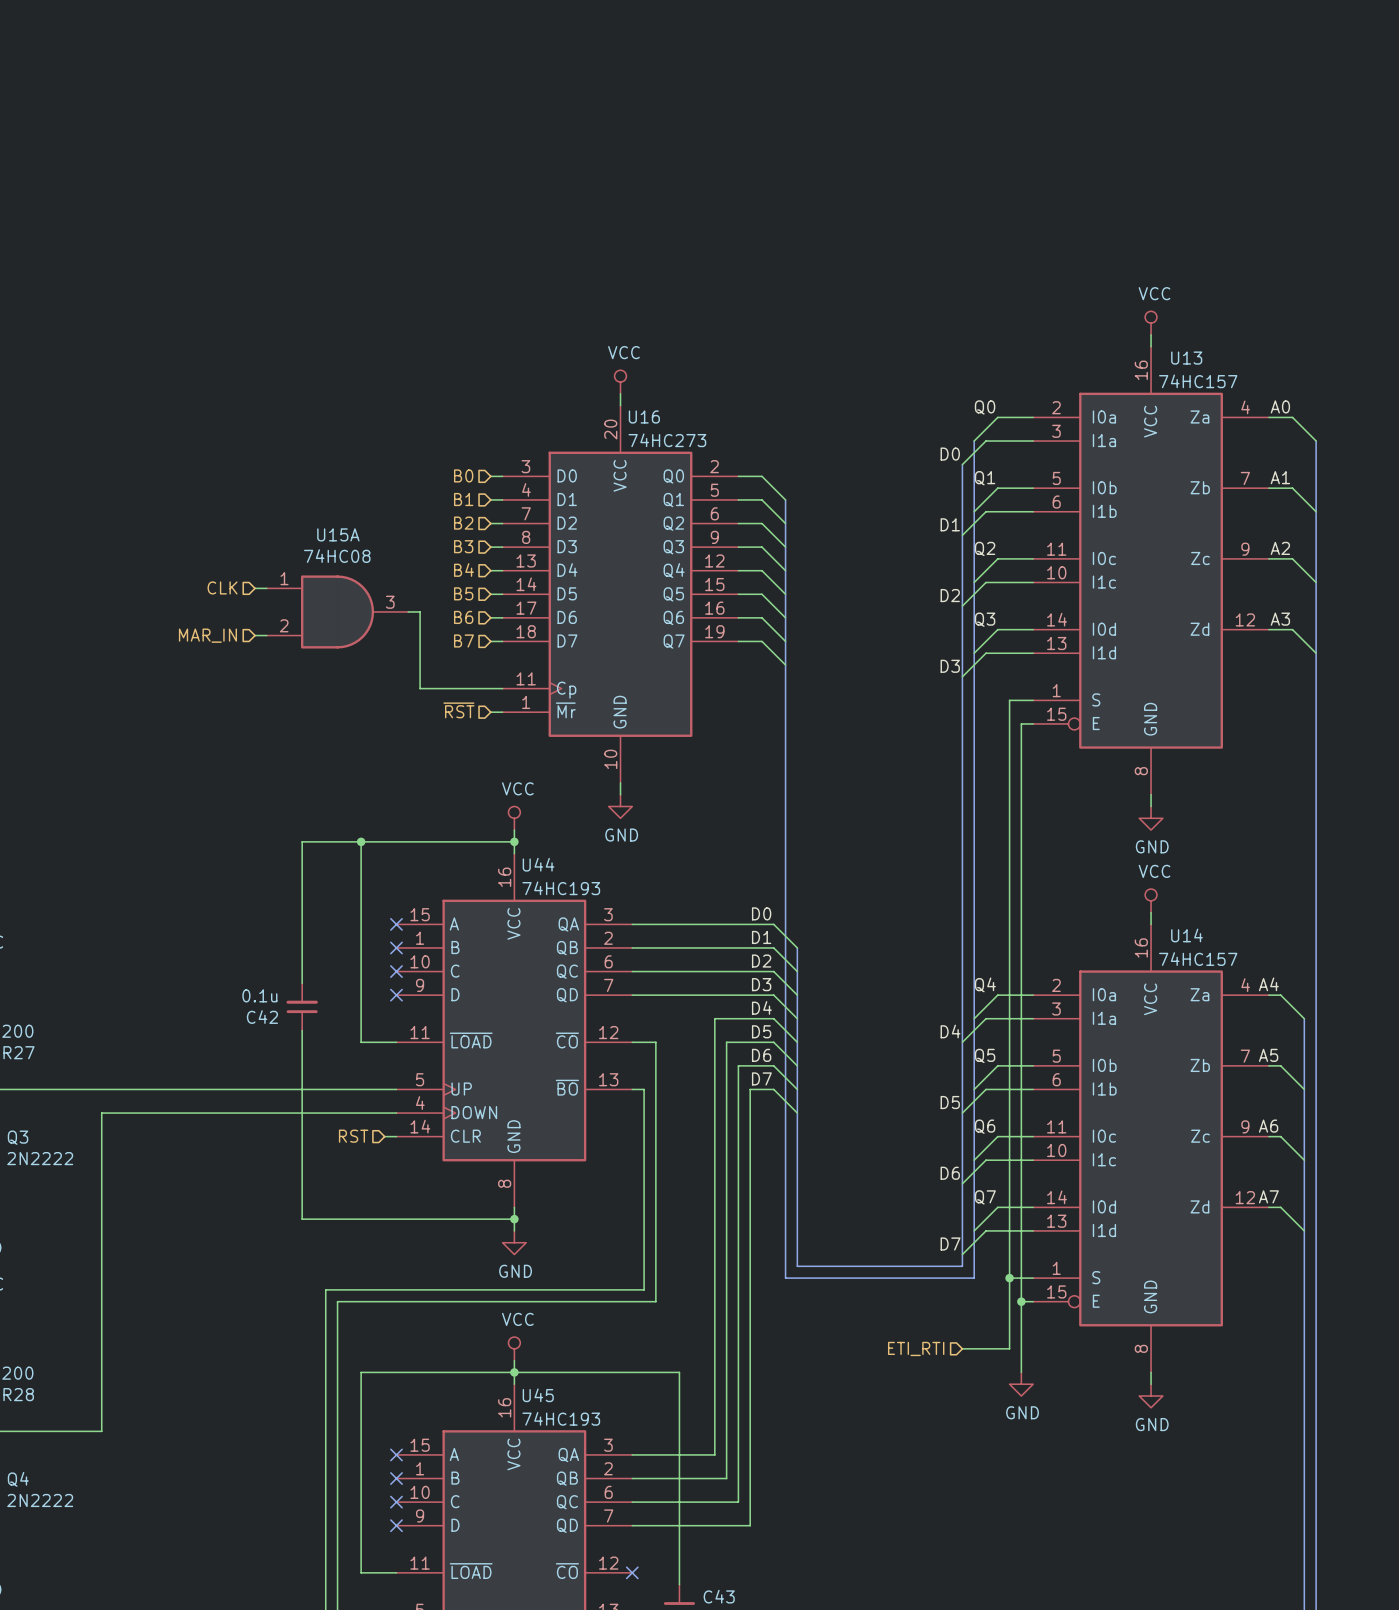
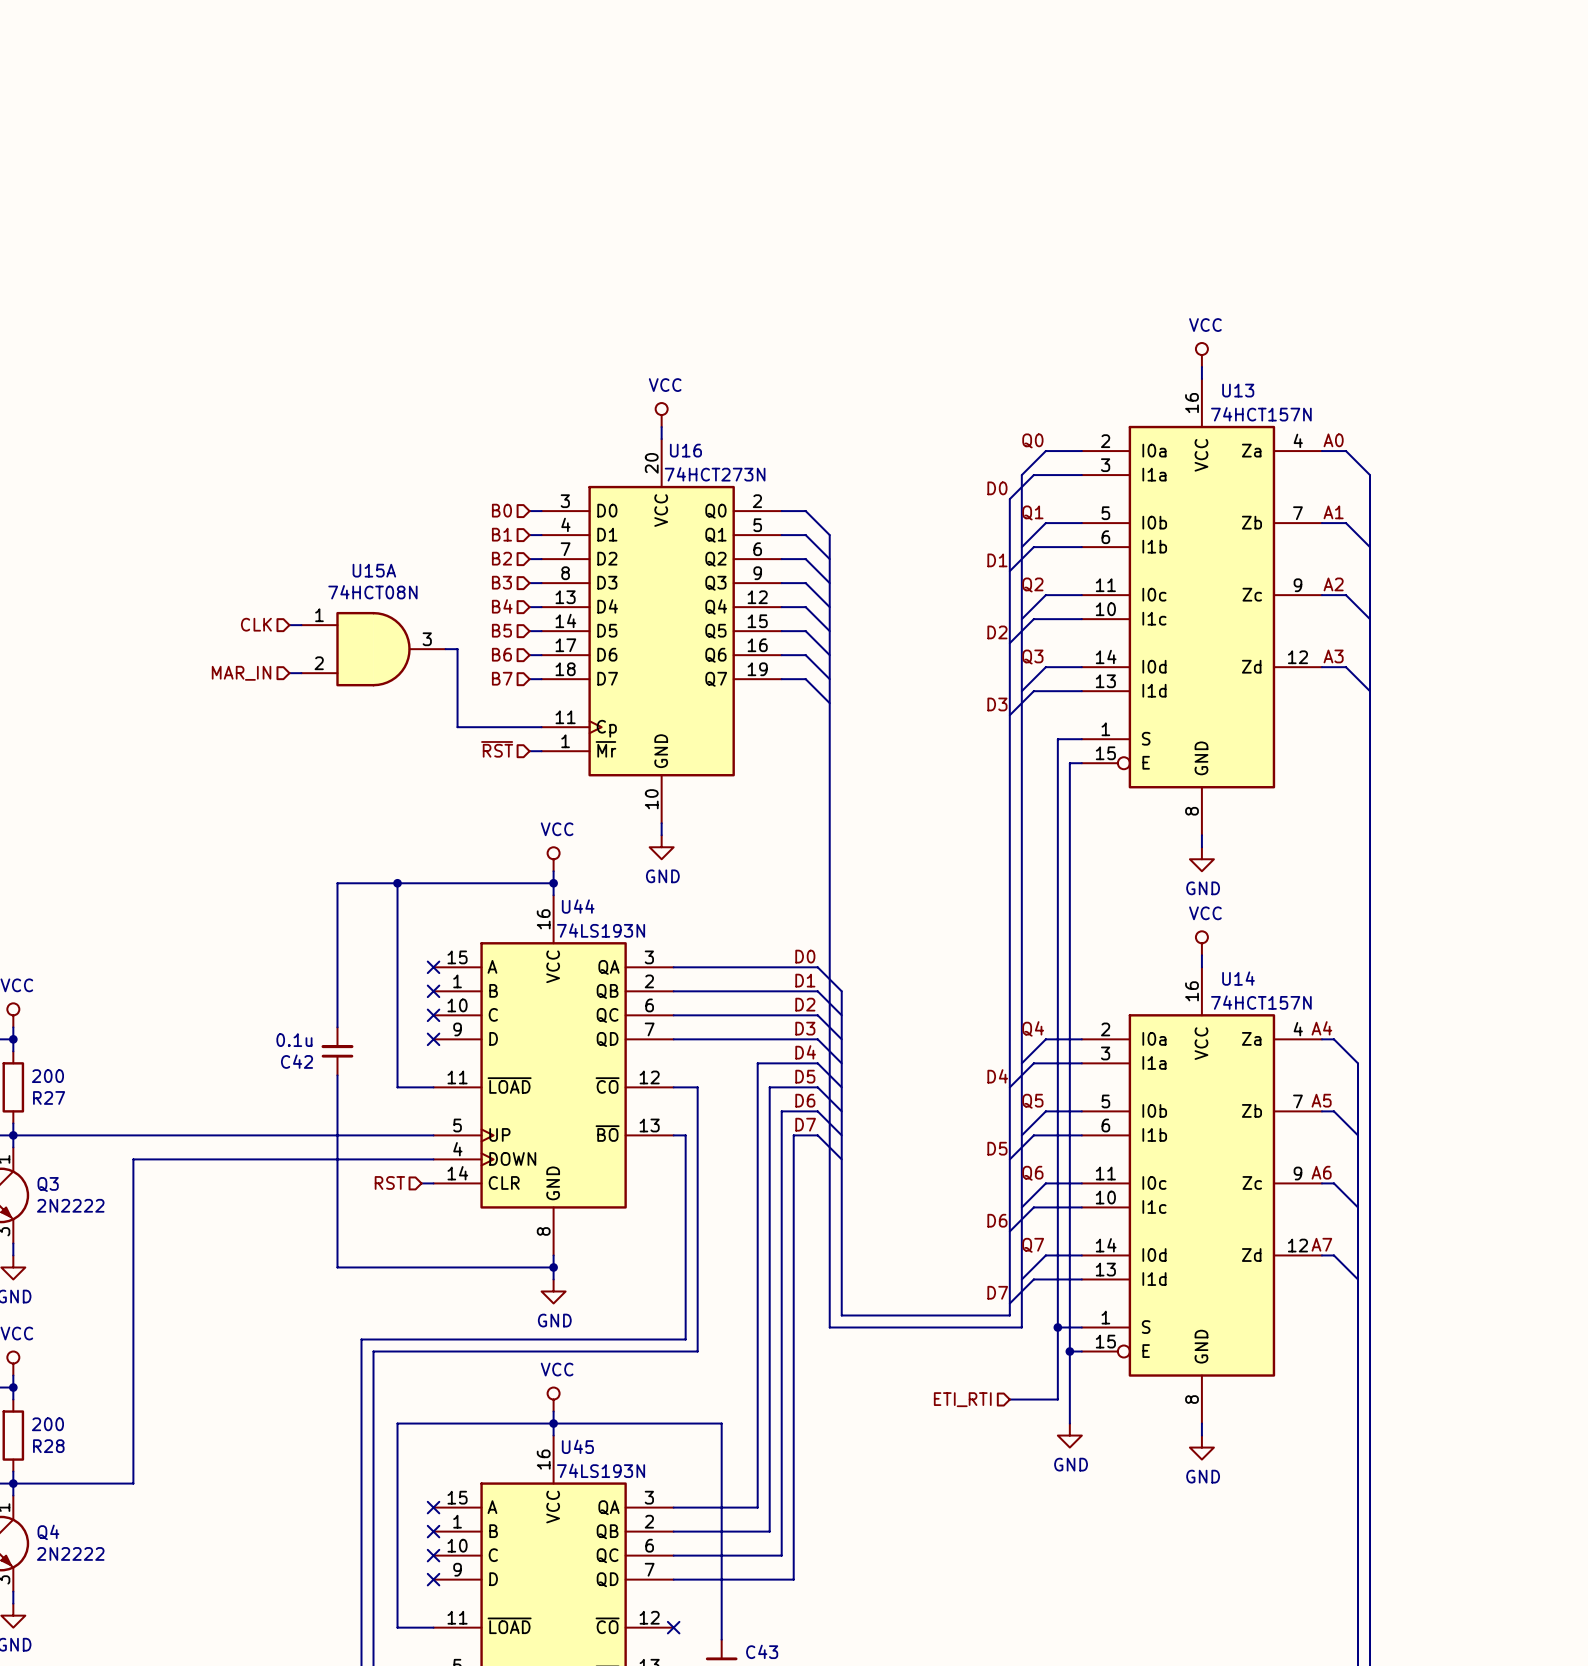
U13 value: 74HC157 (1198, 381) -> 74HCT157N (1261, 414)
U16 value: 74HC273 (667, 440) -> 74HCT273N (715, 474)
U15A value: 74HC08 (337, 556) -> 74HCT08N (372, 592)
U44 value: 74HC193 (561, 888) -> 74LS193N (601, 930)
U14 value: 74HC157 (1198, 959) -> 74HCT157N (1261, 1002)
U45 value: 74HC193 (561, 1418) -> 74LS193N (601, 1470)

